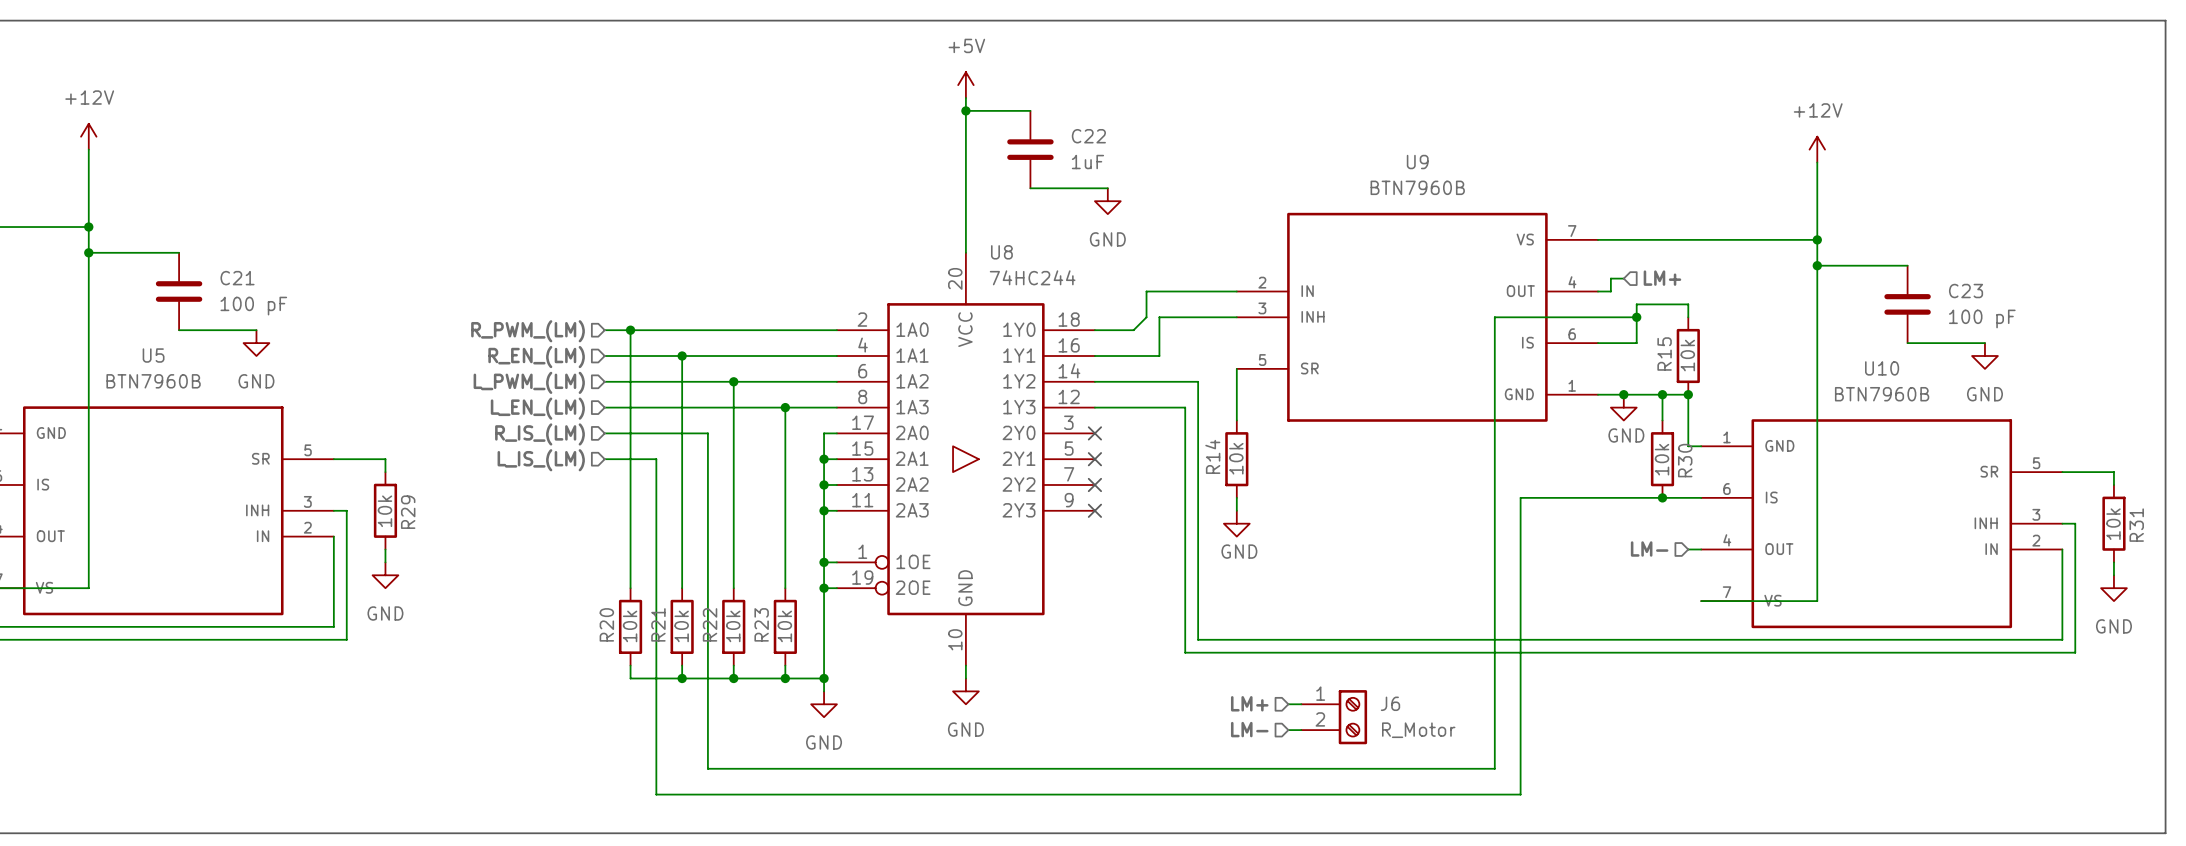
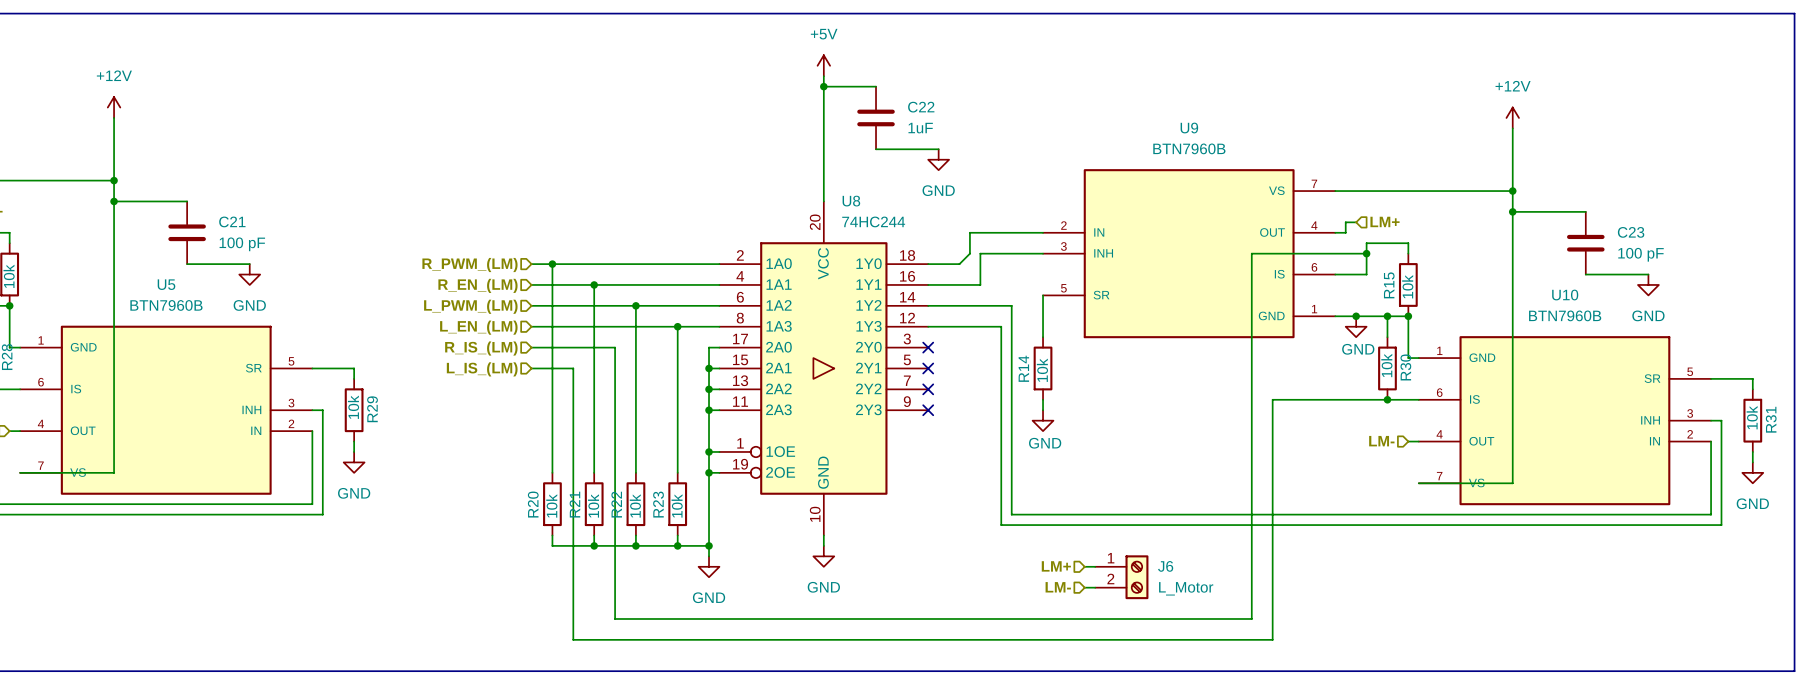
J6 value: R_Motor (1418, 730) -> L_Motor (1186, 588)

